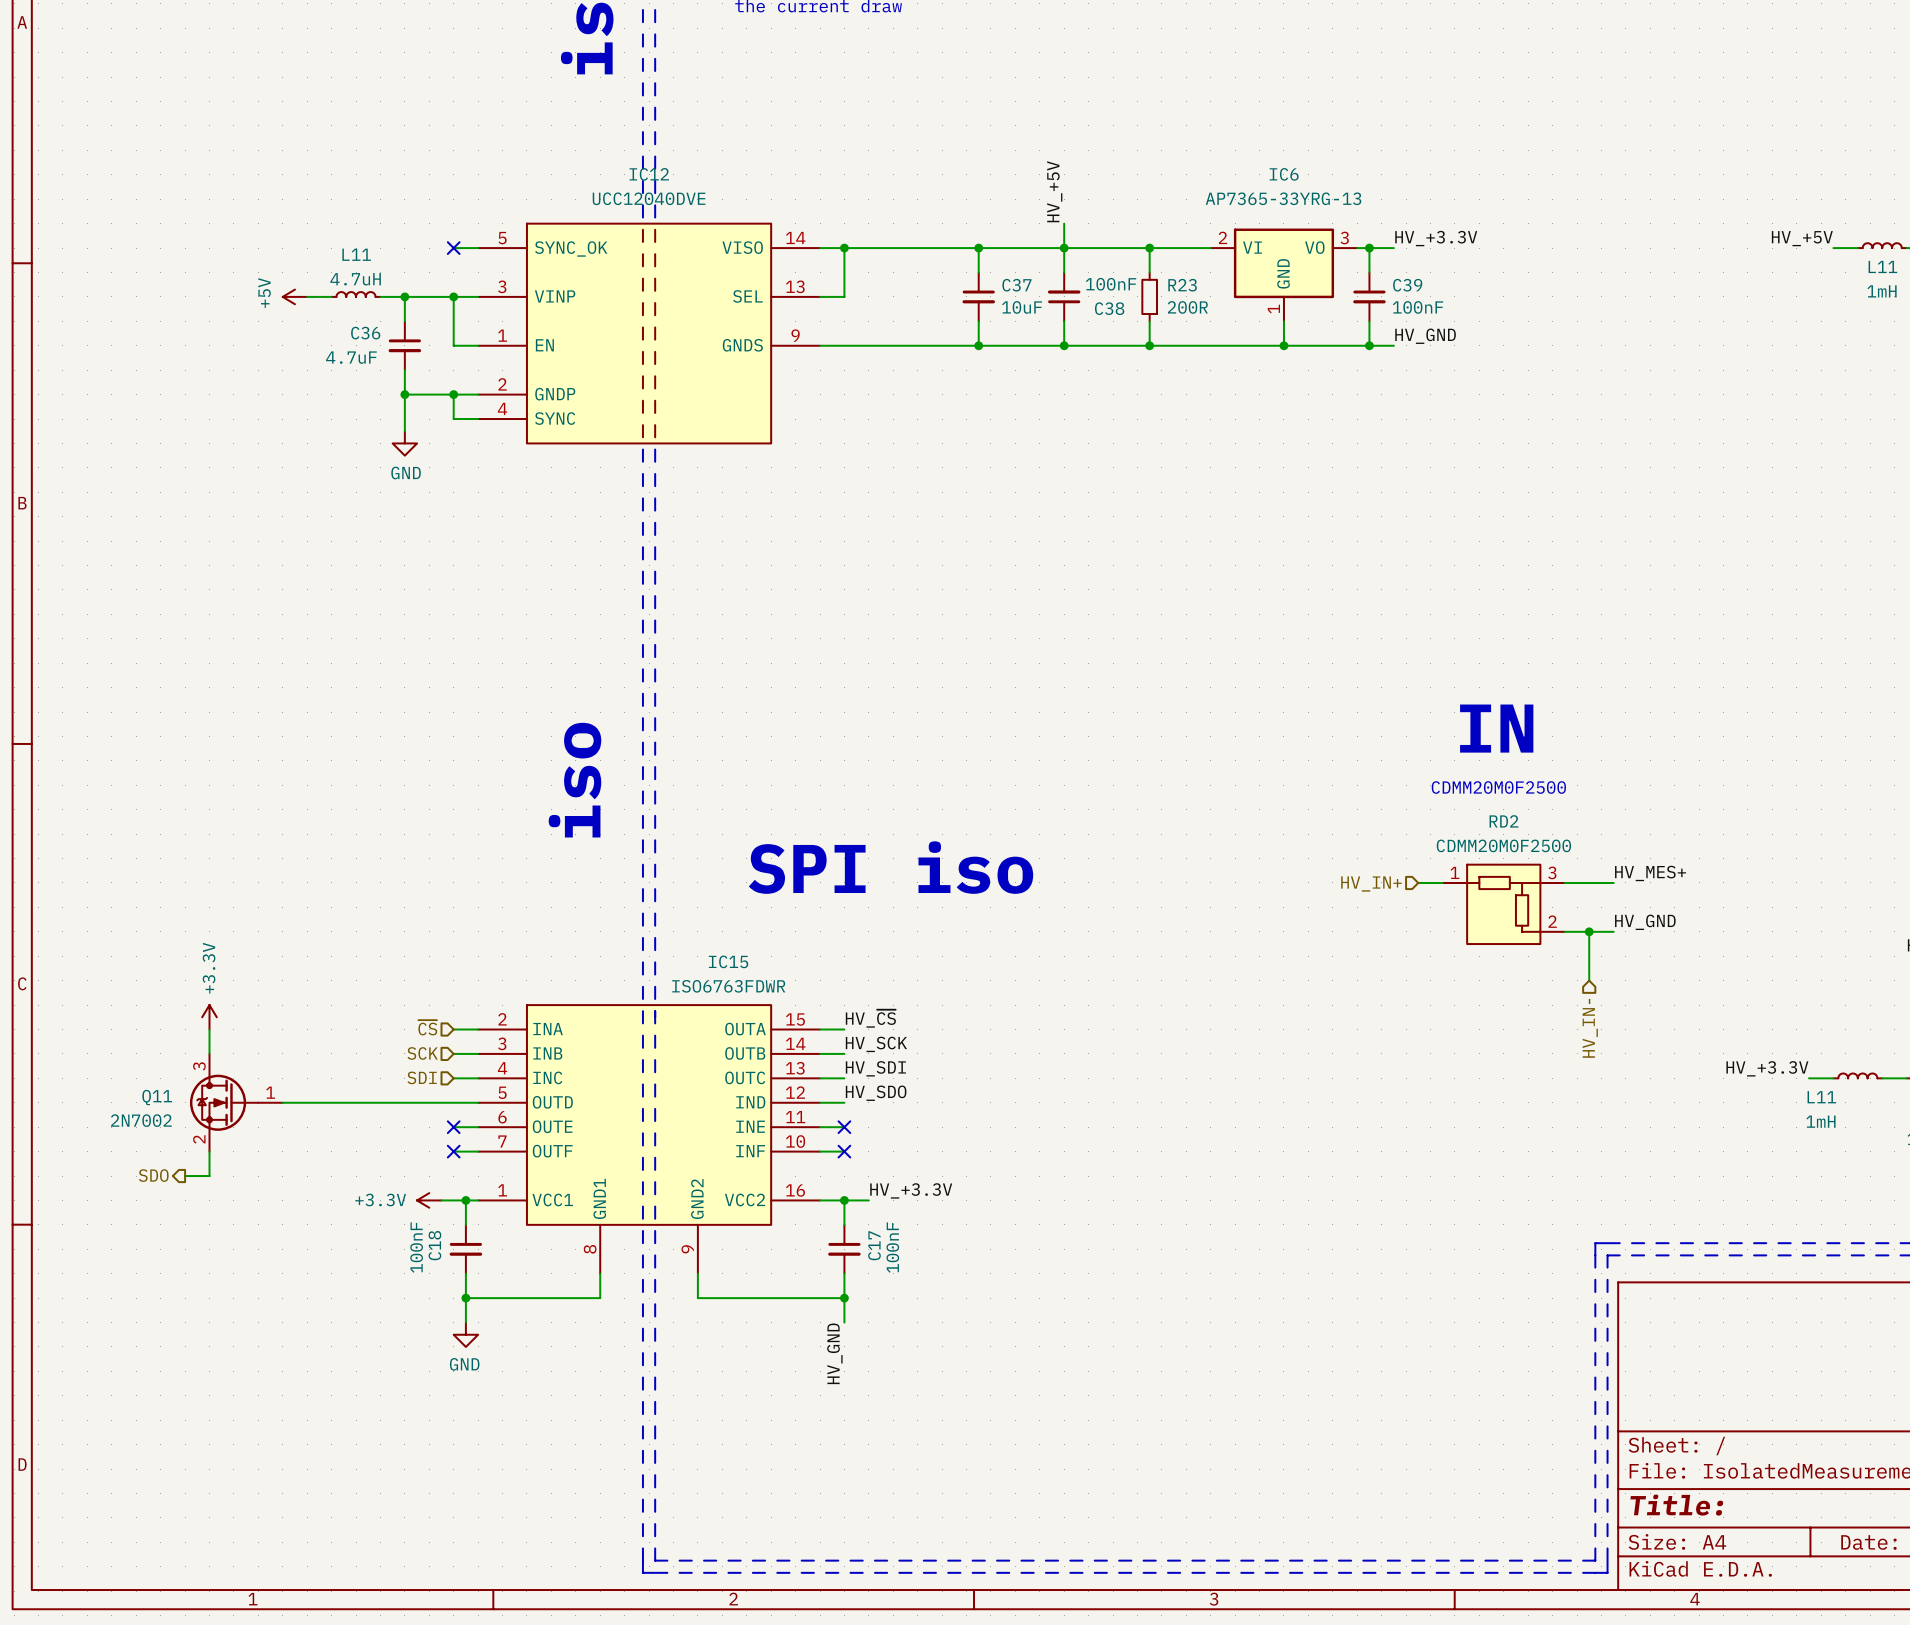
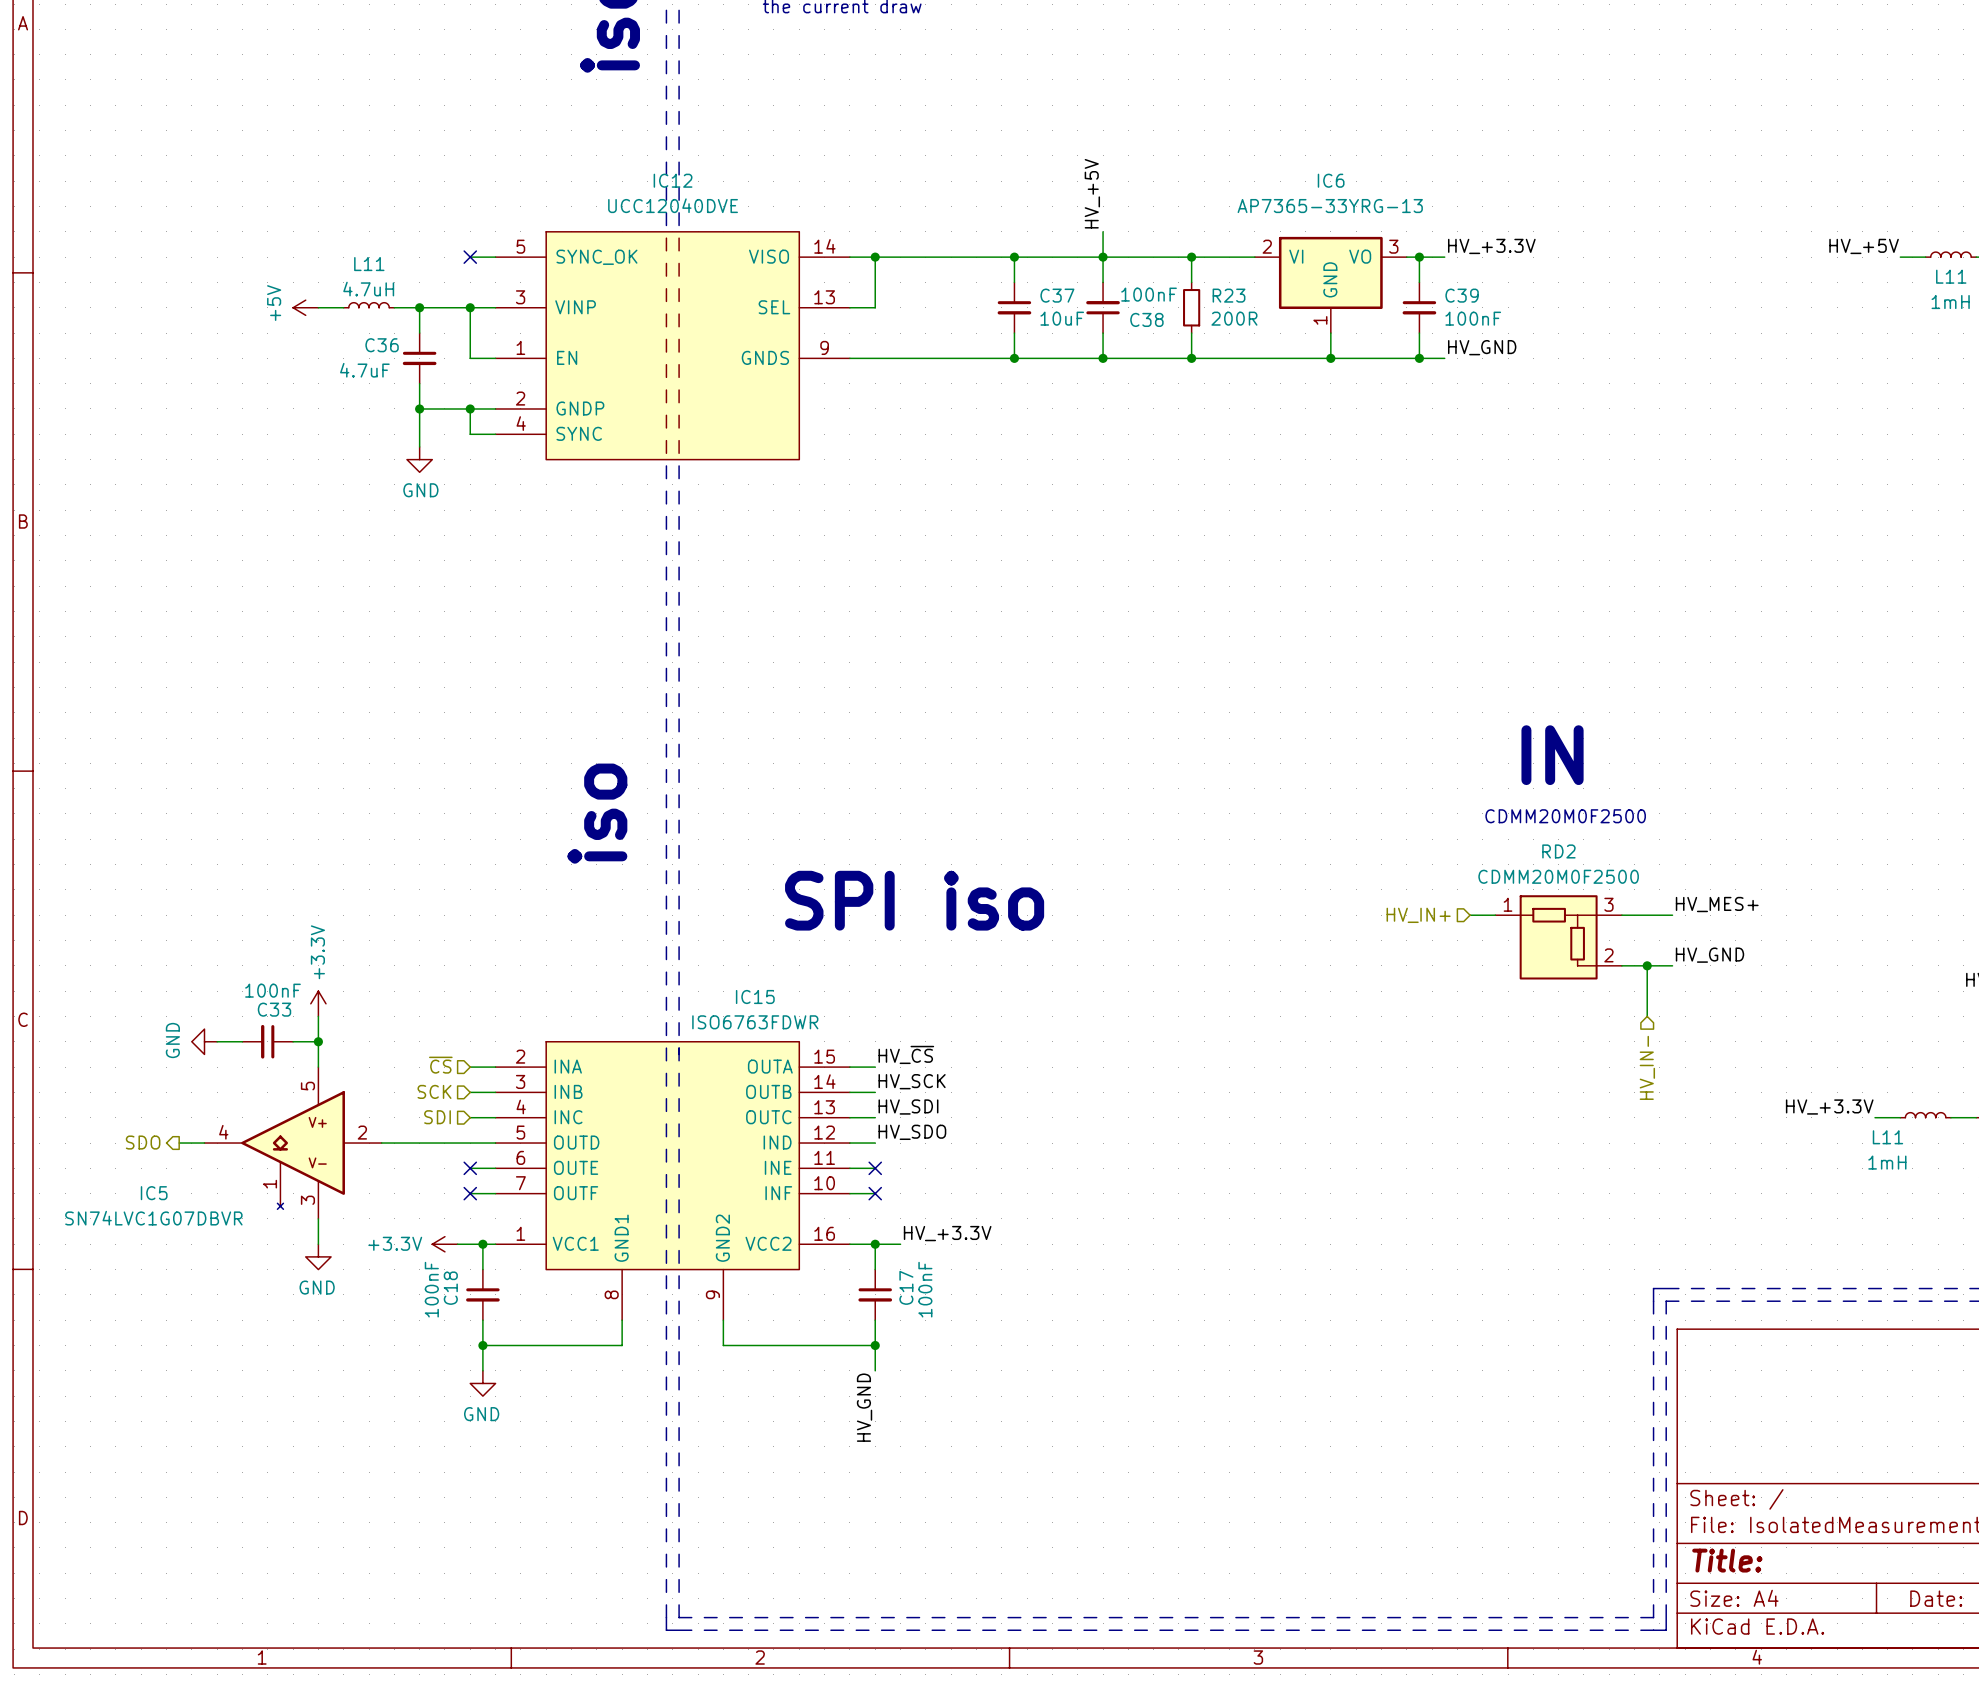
wire: none -> (318, 1016) (318, 1067)
power symbol: none -> GND (204, 1041)
wire: none -> (217, 1041) (242, 1041)
C33: none -> 100nF (267, 1041)
wire: none -> (293, 1041) (318, 1041)
junction: none -> (318, 1041)
power symbol position: +3.3V (209, 1017) -> +3.3V (318, 1003)
wire: (209, 1029) (209, 1053) -> (318, 1218) (318, 1244)
wire: none -> (179, 1143) (204, 1143)
Q11: 2N7002 (236, 1102) -> none
IC5: none -> SN74LVC1G07DBVR (293, 1143)
wire: (209, 1151) (209, 1176) (185, 1176) -> none
hierarchical label position: SDO (153, 1175) -> SDO (143, 1142)
power symbol: none -> GND (318, 1256)

